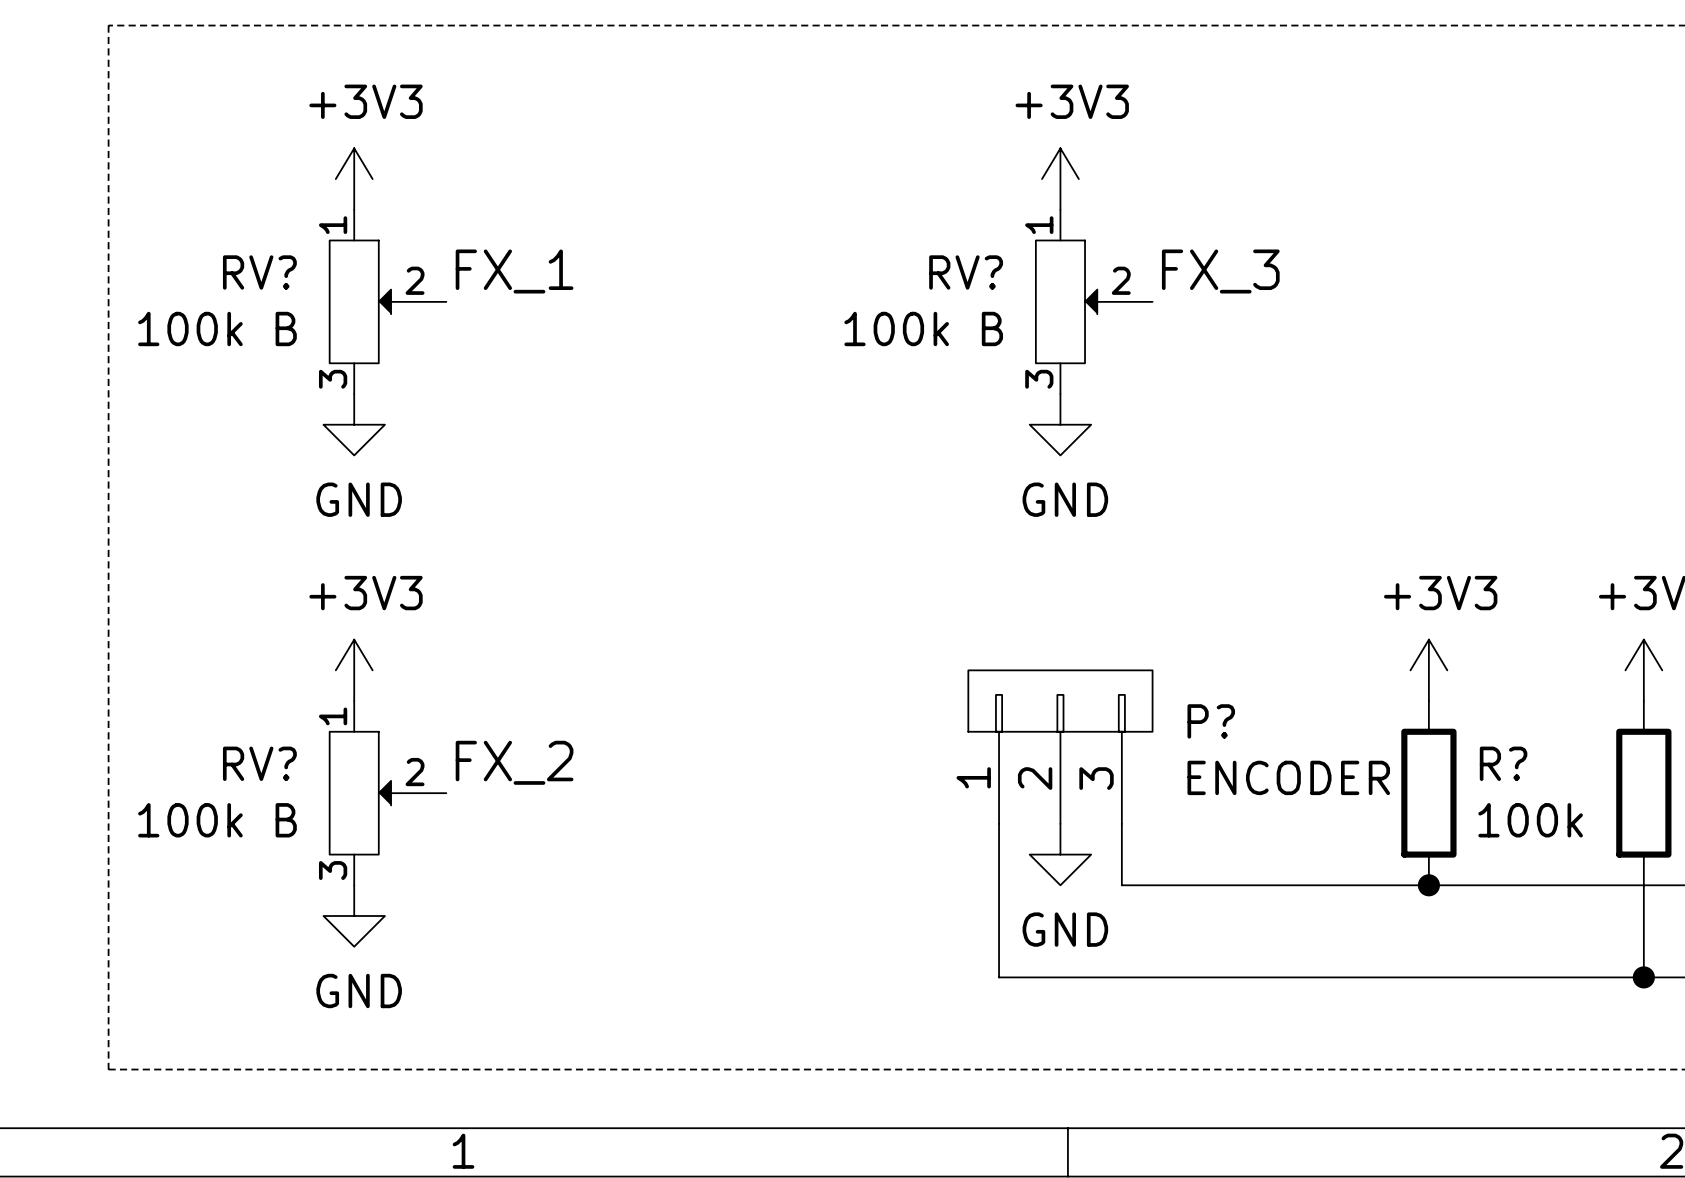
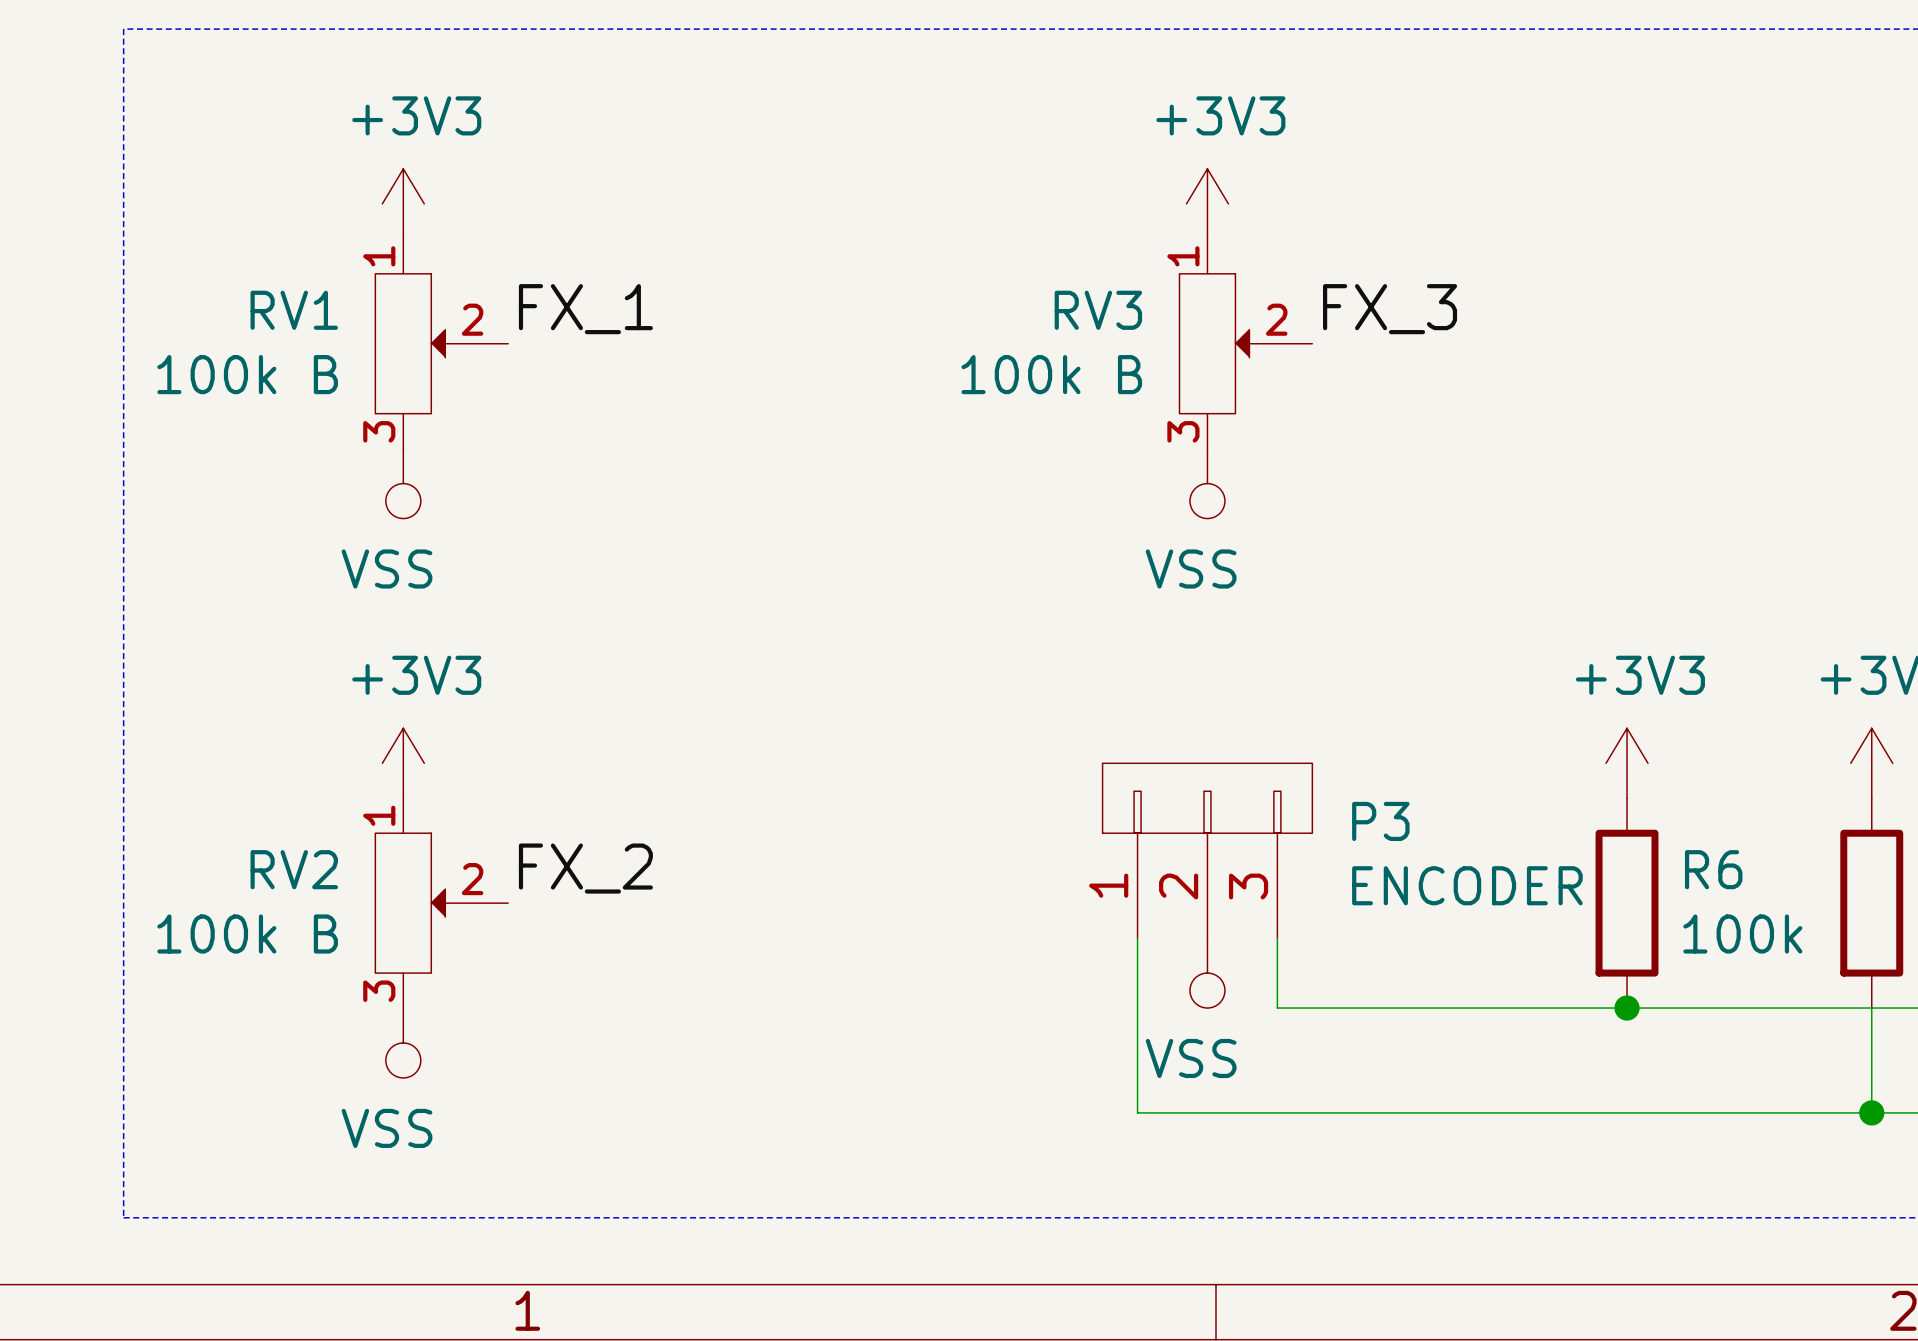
RV? name: RV? (259, 272) -> RV1 (294, 310)
RV? name: RV? (966, 272) -> RV3 (1098, 310)
power symbol: GND (354, 424) -> VSS (403, 483)
power symbol: GND (1060, 424) -> VSS (1207, 483)
P? name: P? (1211, 721) -> P3 (1380, 821)
RV? name: RV? (259, 763) -> RV2 (294, 869)
R? name: R? (1503, 763) -> R6 (1713, 869)
power symbol: GND (1060, 854) -> VSS (1207, 973)
power symbol: GND (354, 916) -> VSS (403, 1042)

